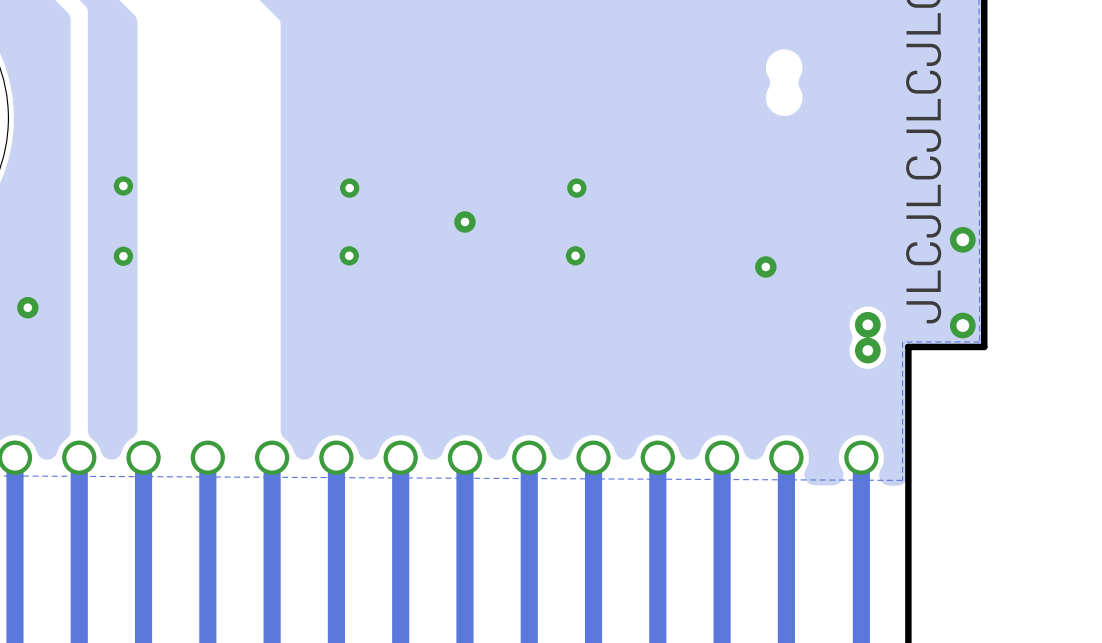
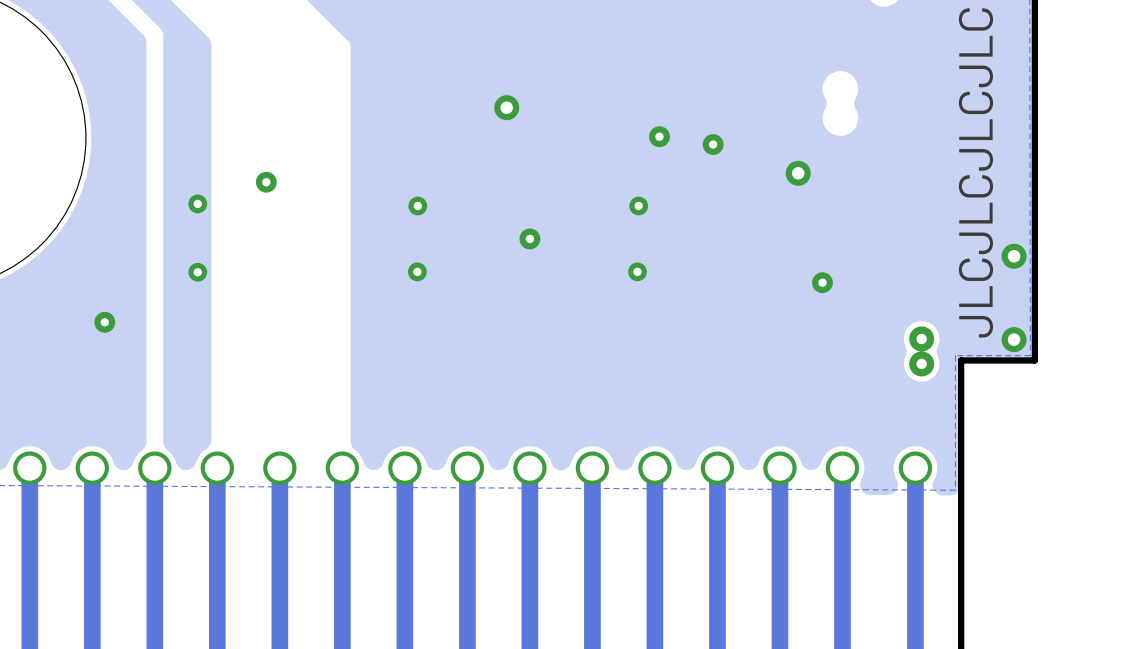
via: none -> (506, 107)
via: none -> (659, 136)
via: none -> (713, 144)
via: none -> (798, 173)
via: none -> (266, 182)

